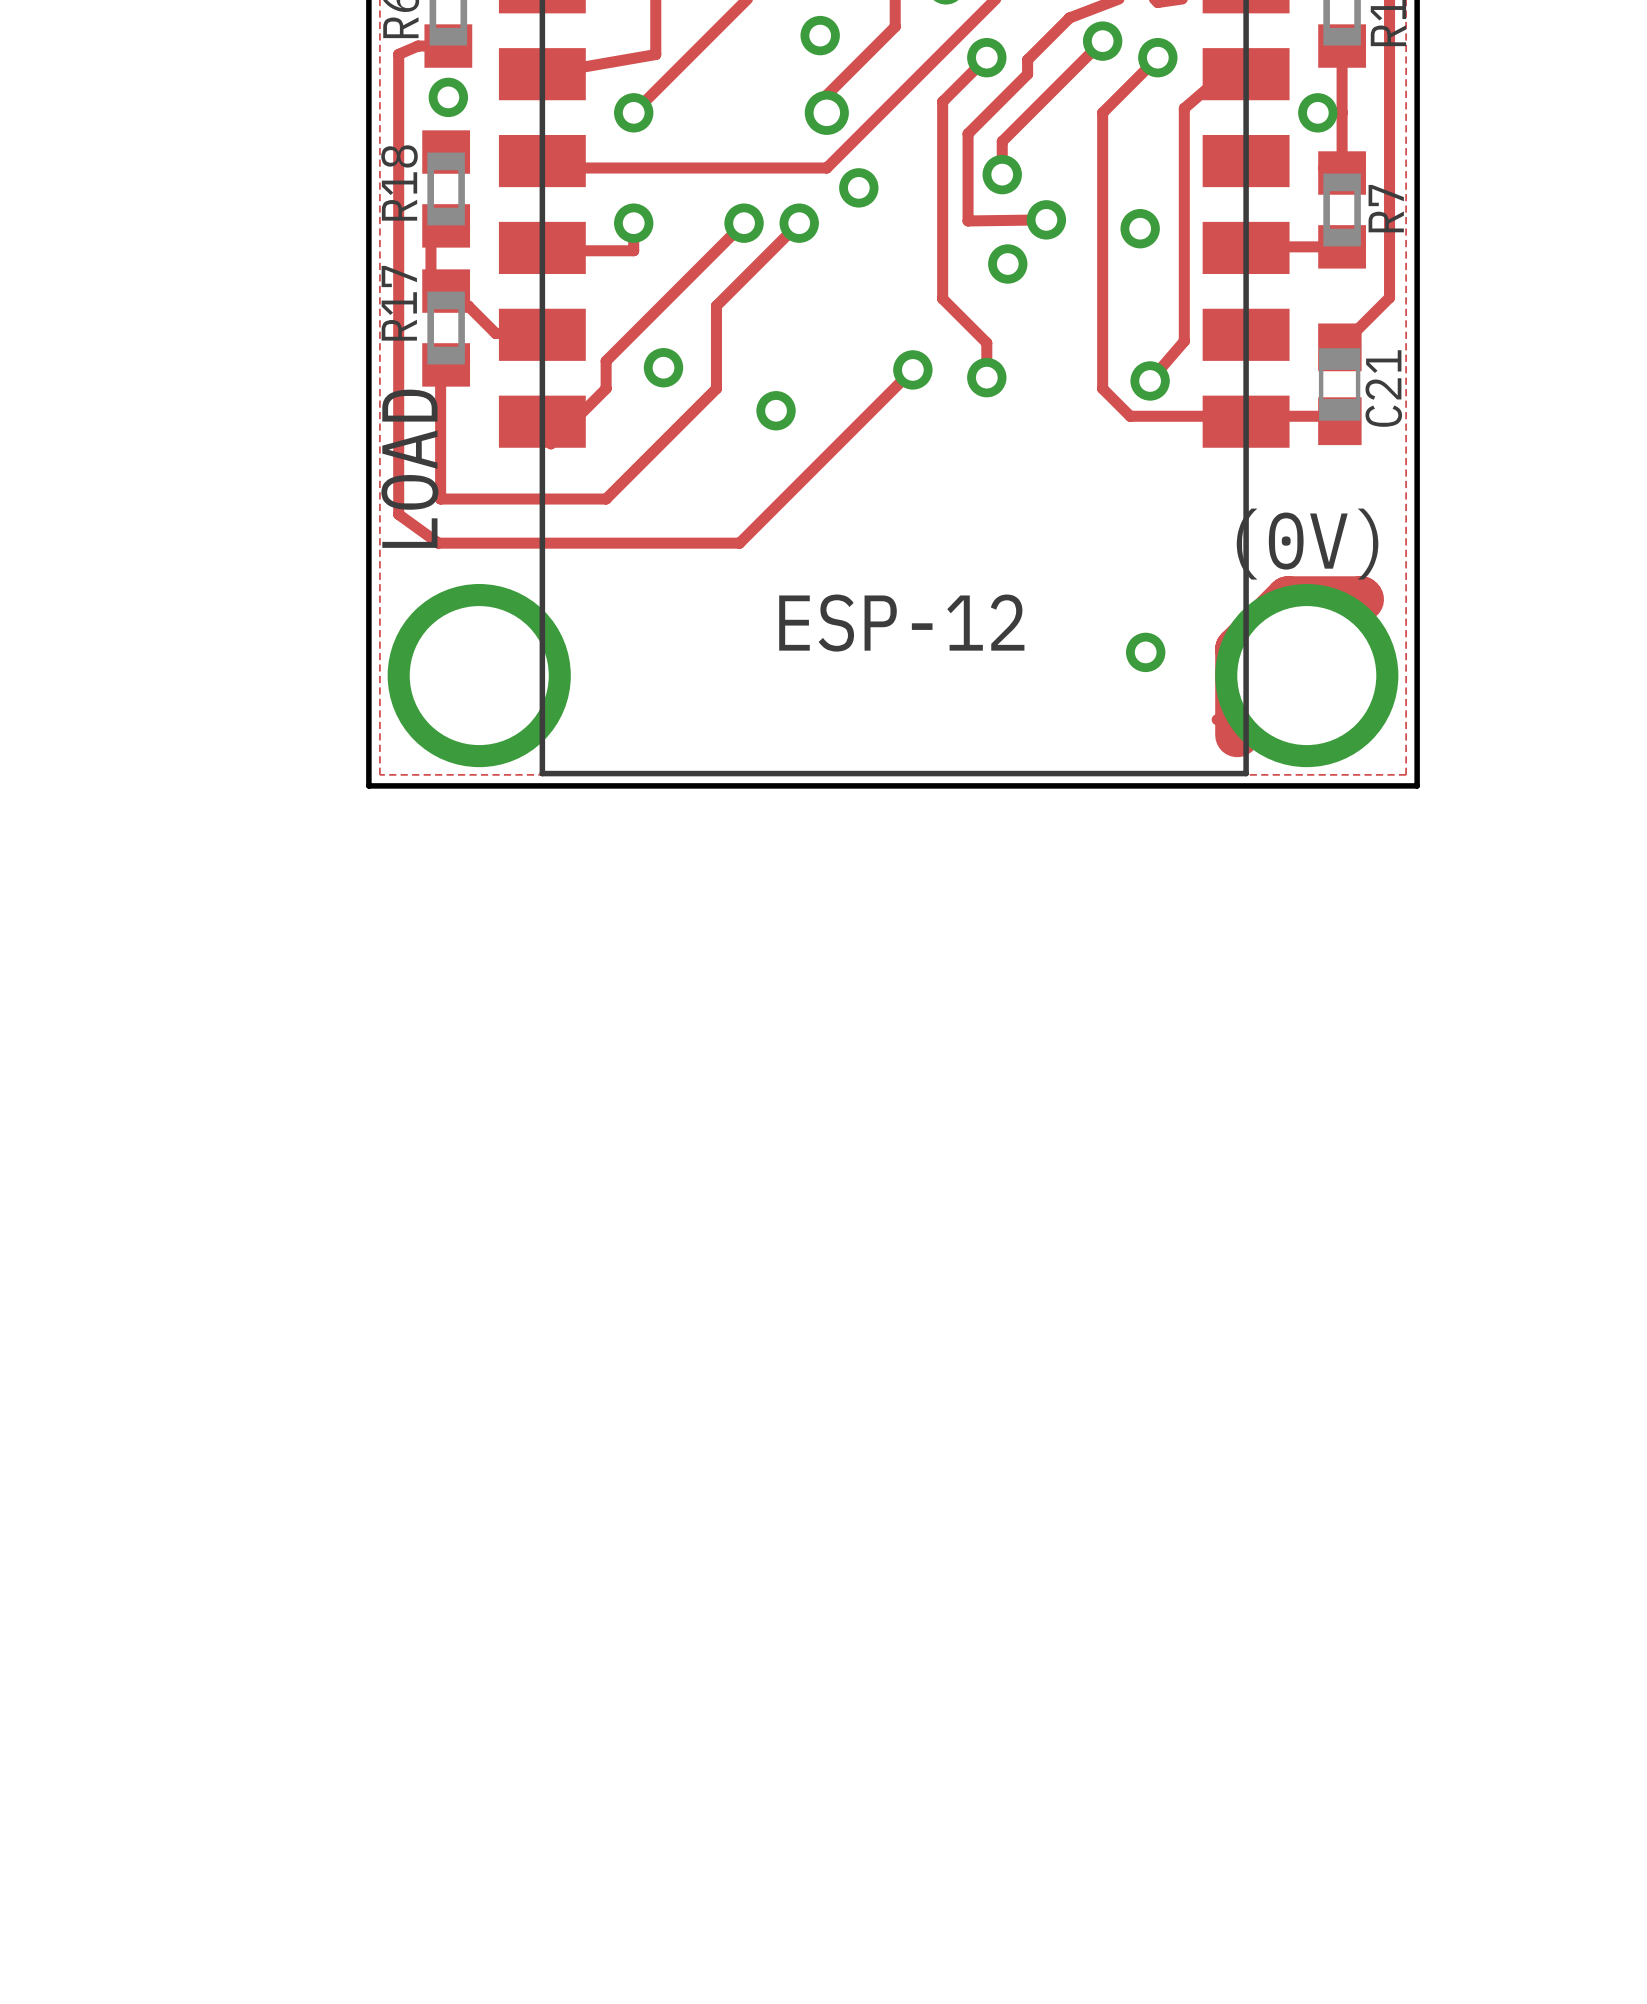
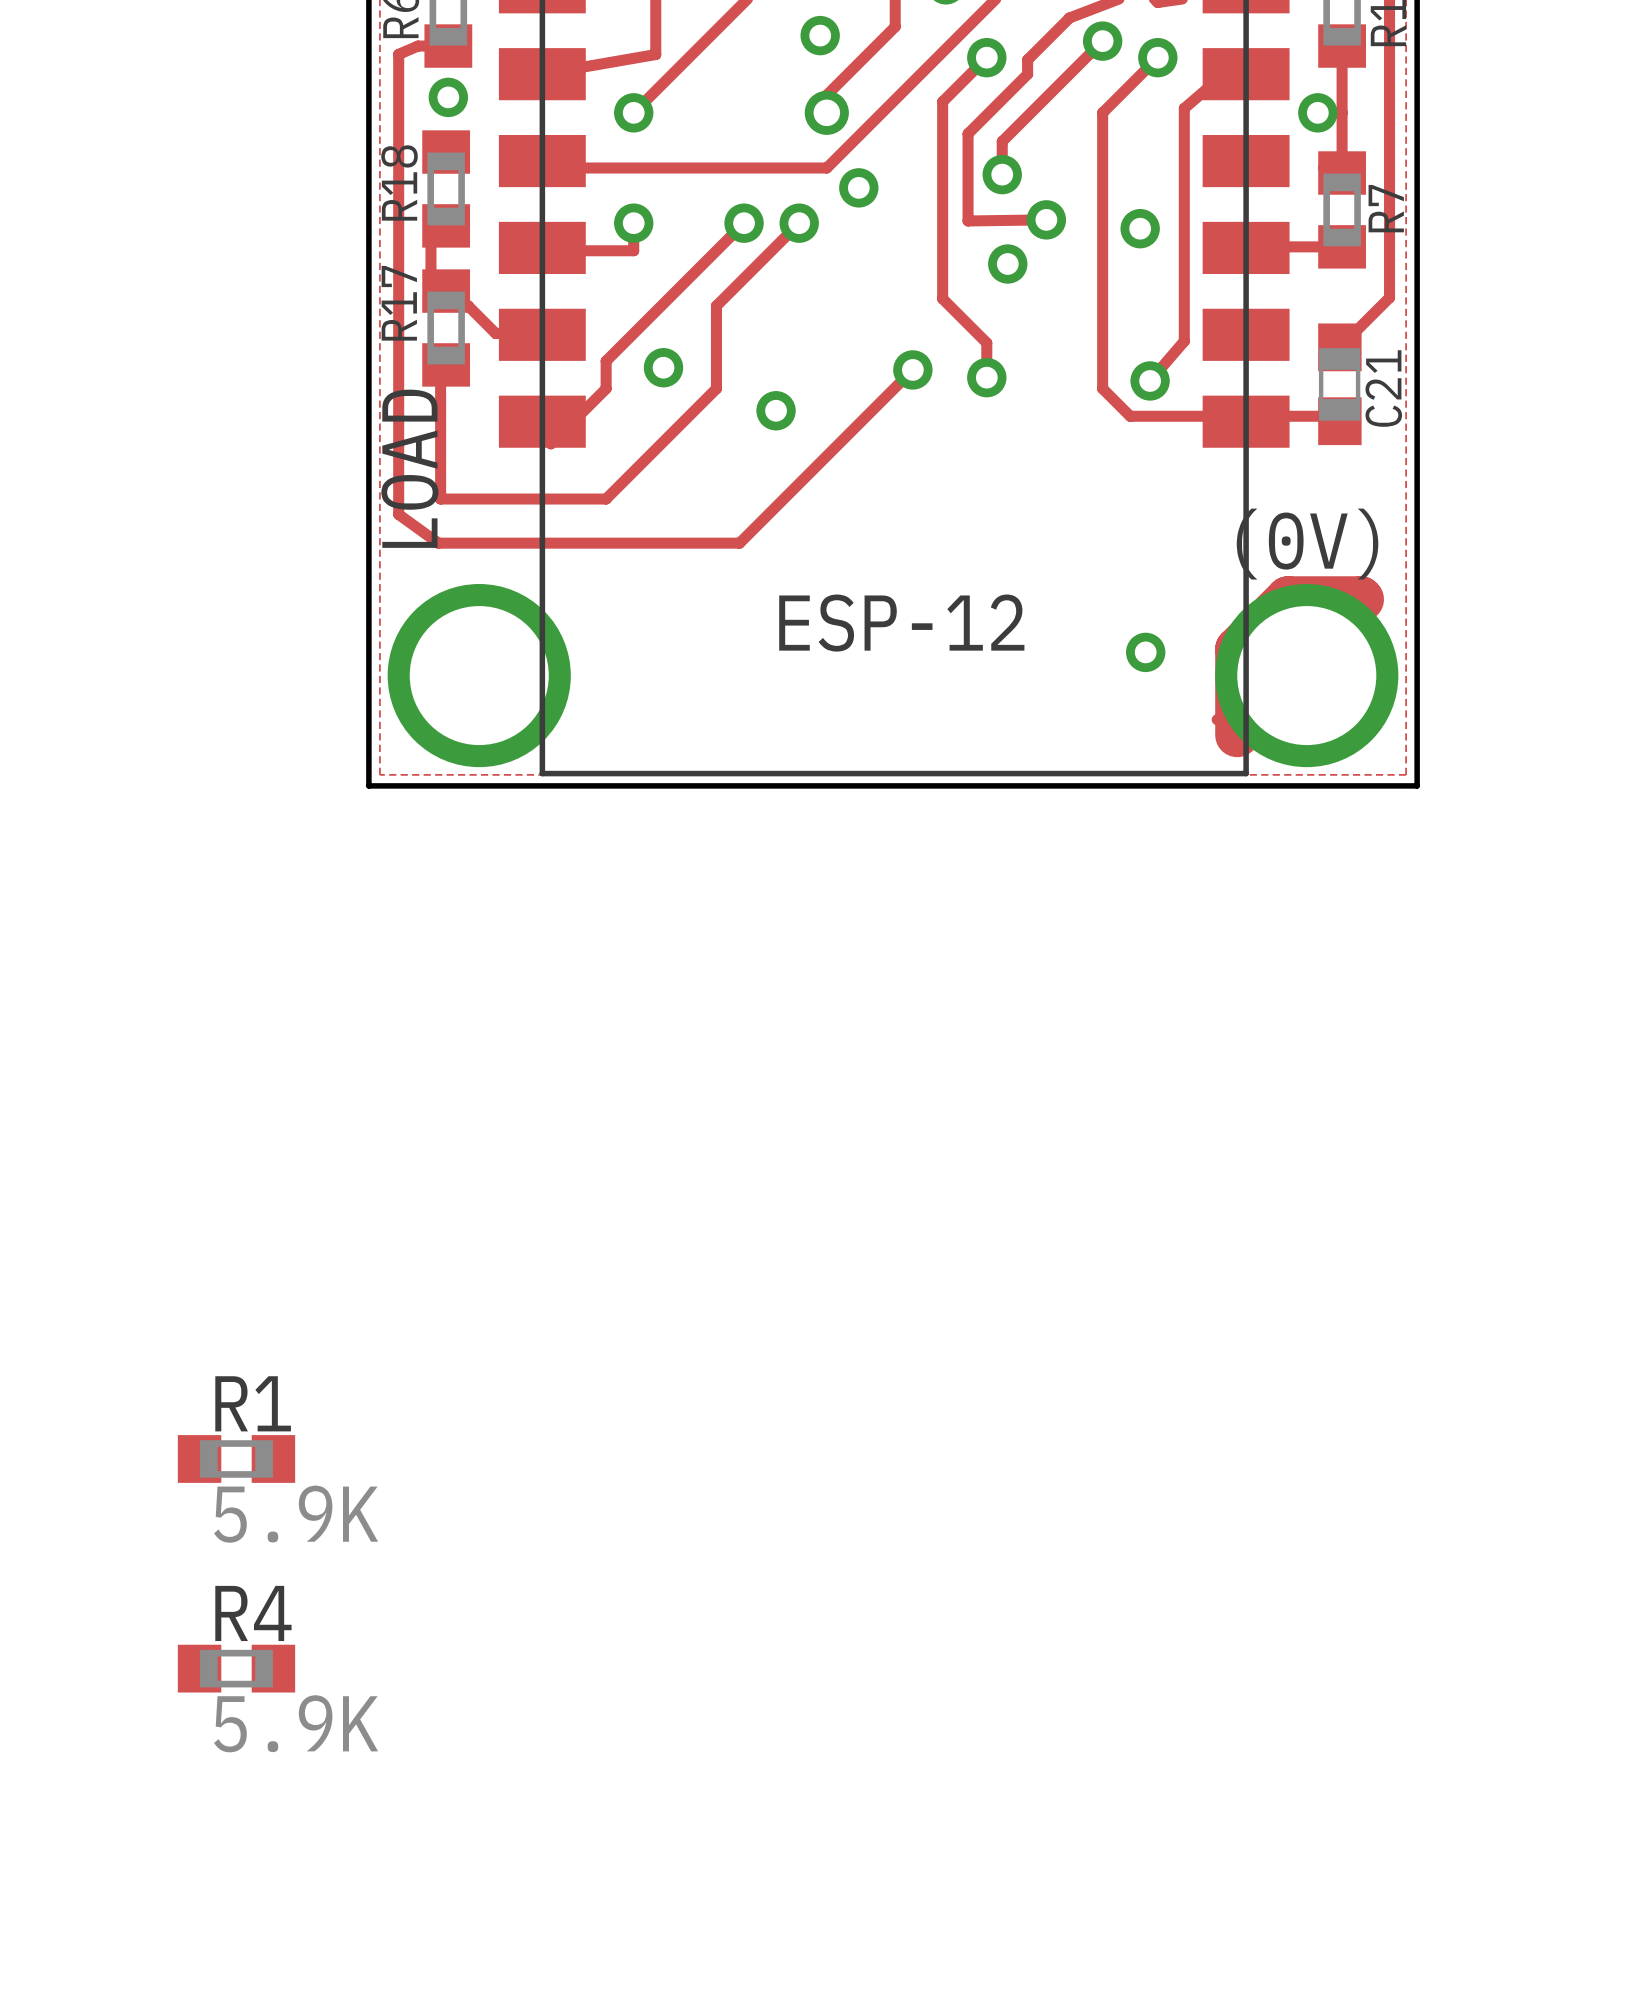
R1: none -> 5.9K (236, 1458)
R4: none -> 5.9K (236, 1668)

